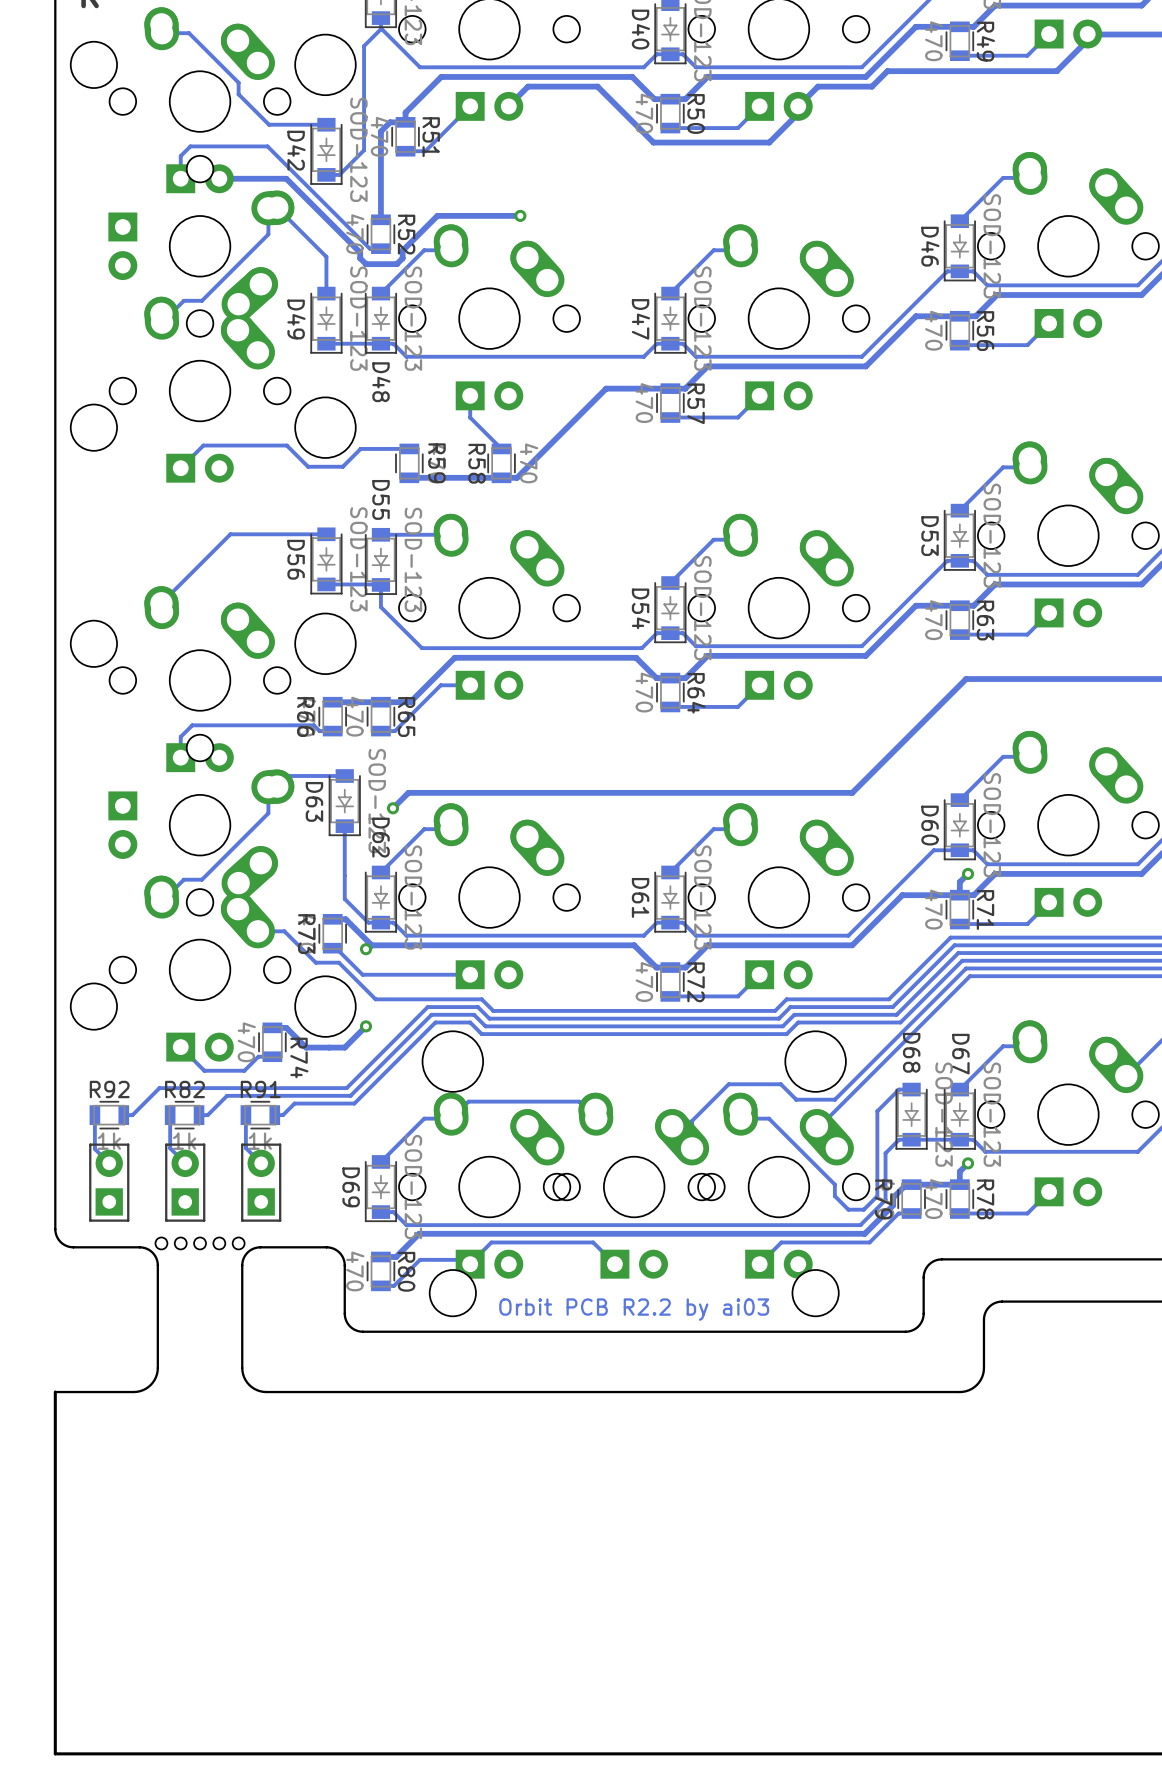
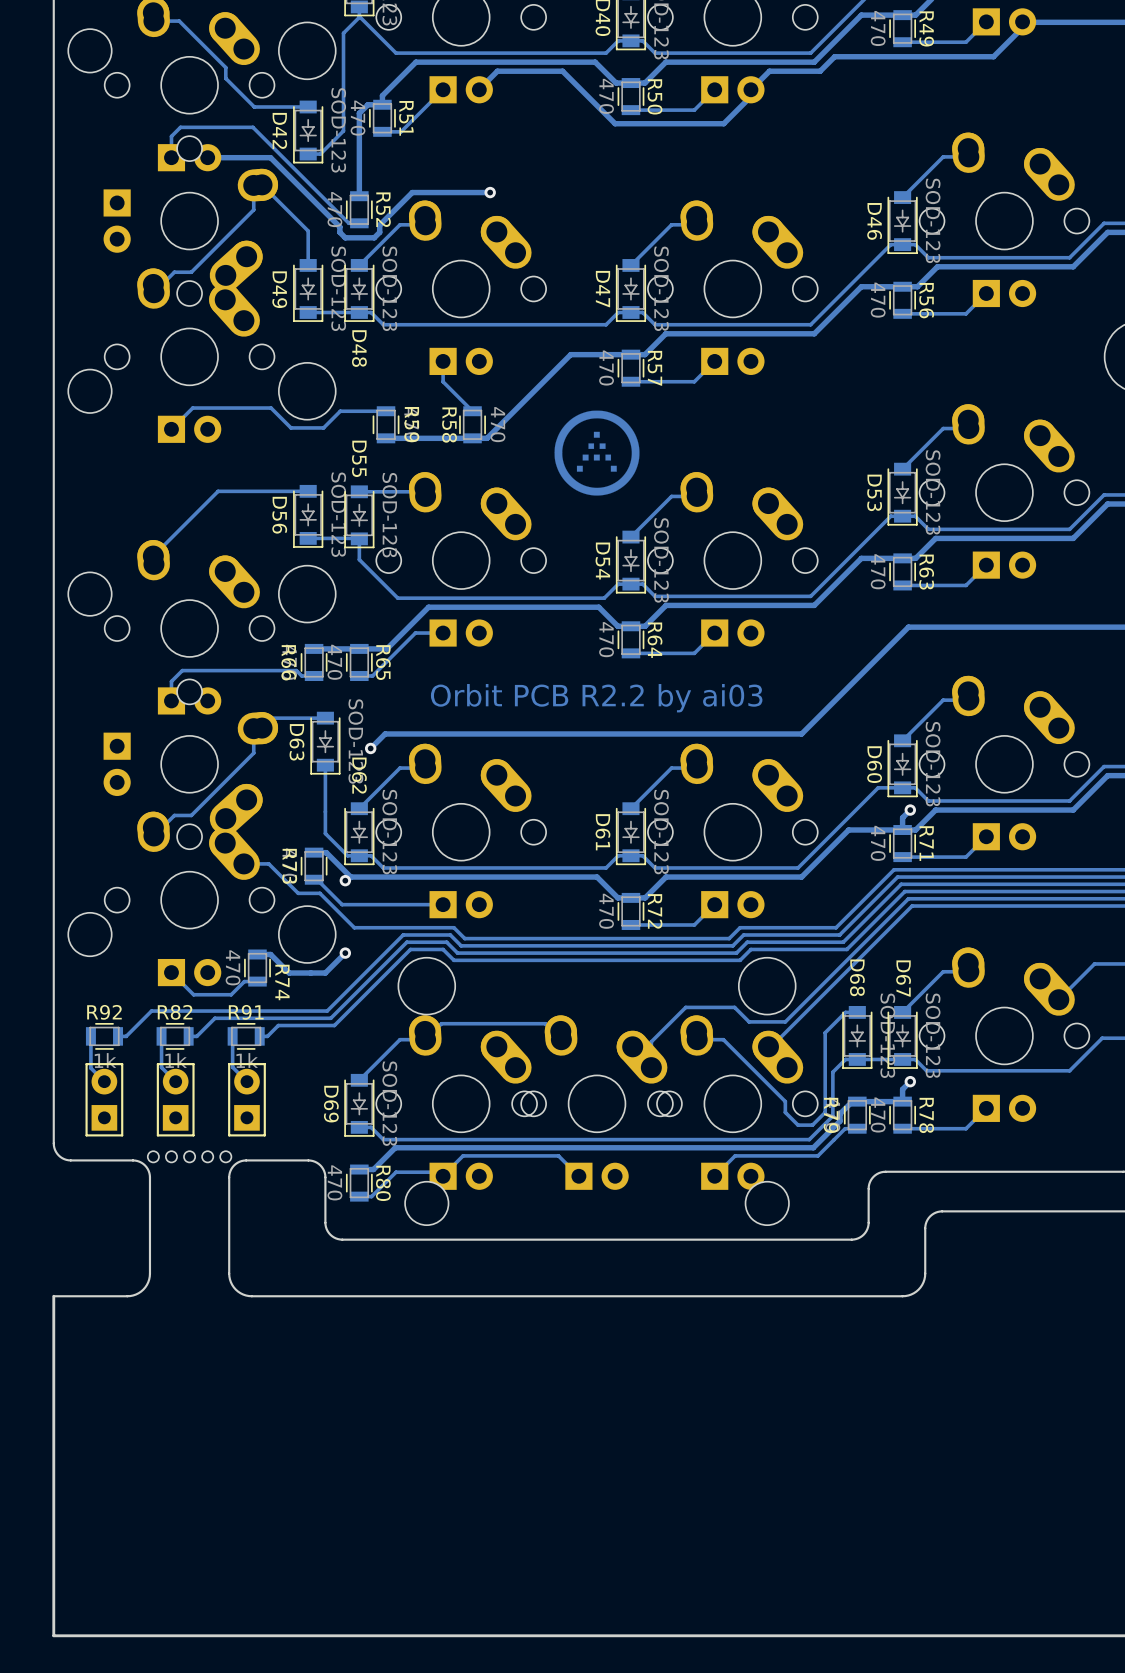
drawing: none -> [554, 410, 640, 496]
text: none -> Orbit PCB R2.2 by ai03 (596, 698)
text: Orbit PCB R2.2 by ai03 (634, 1309) -> none

